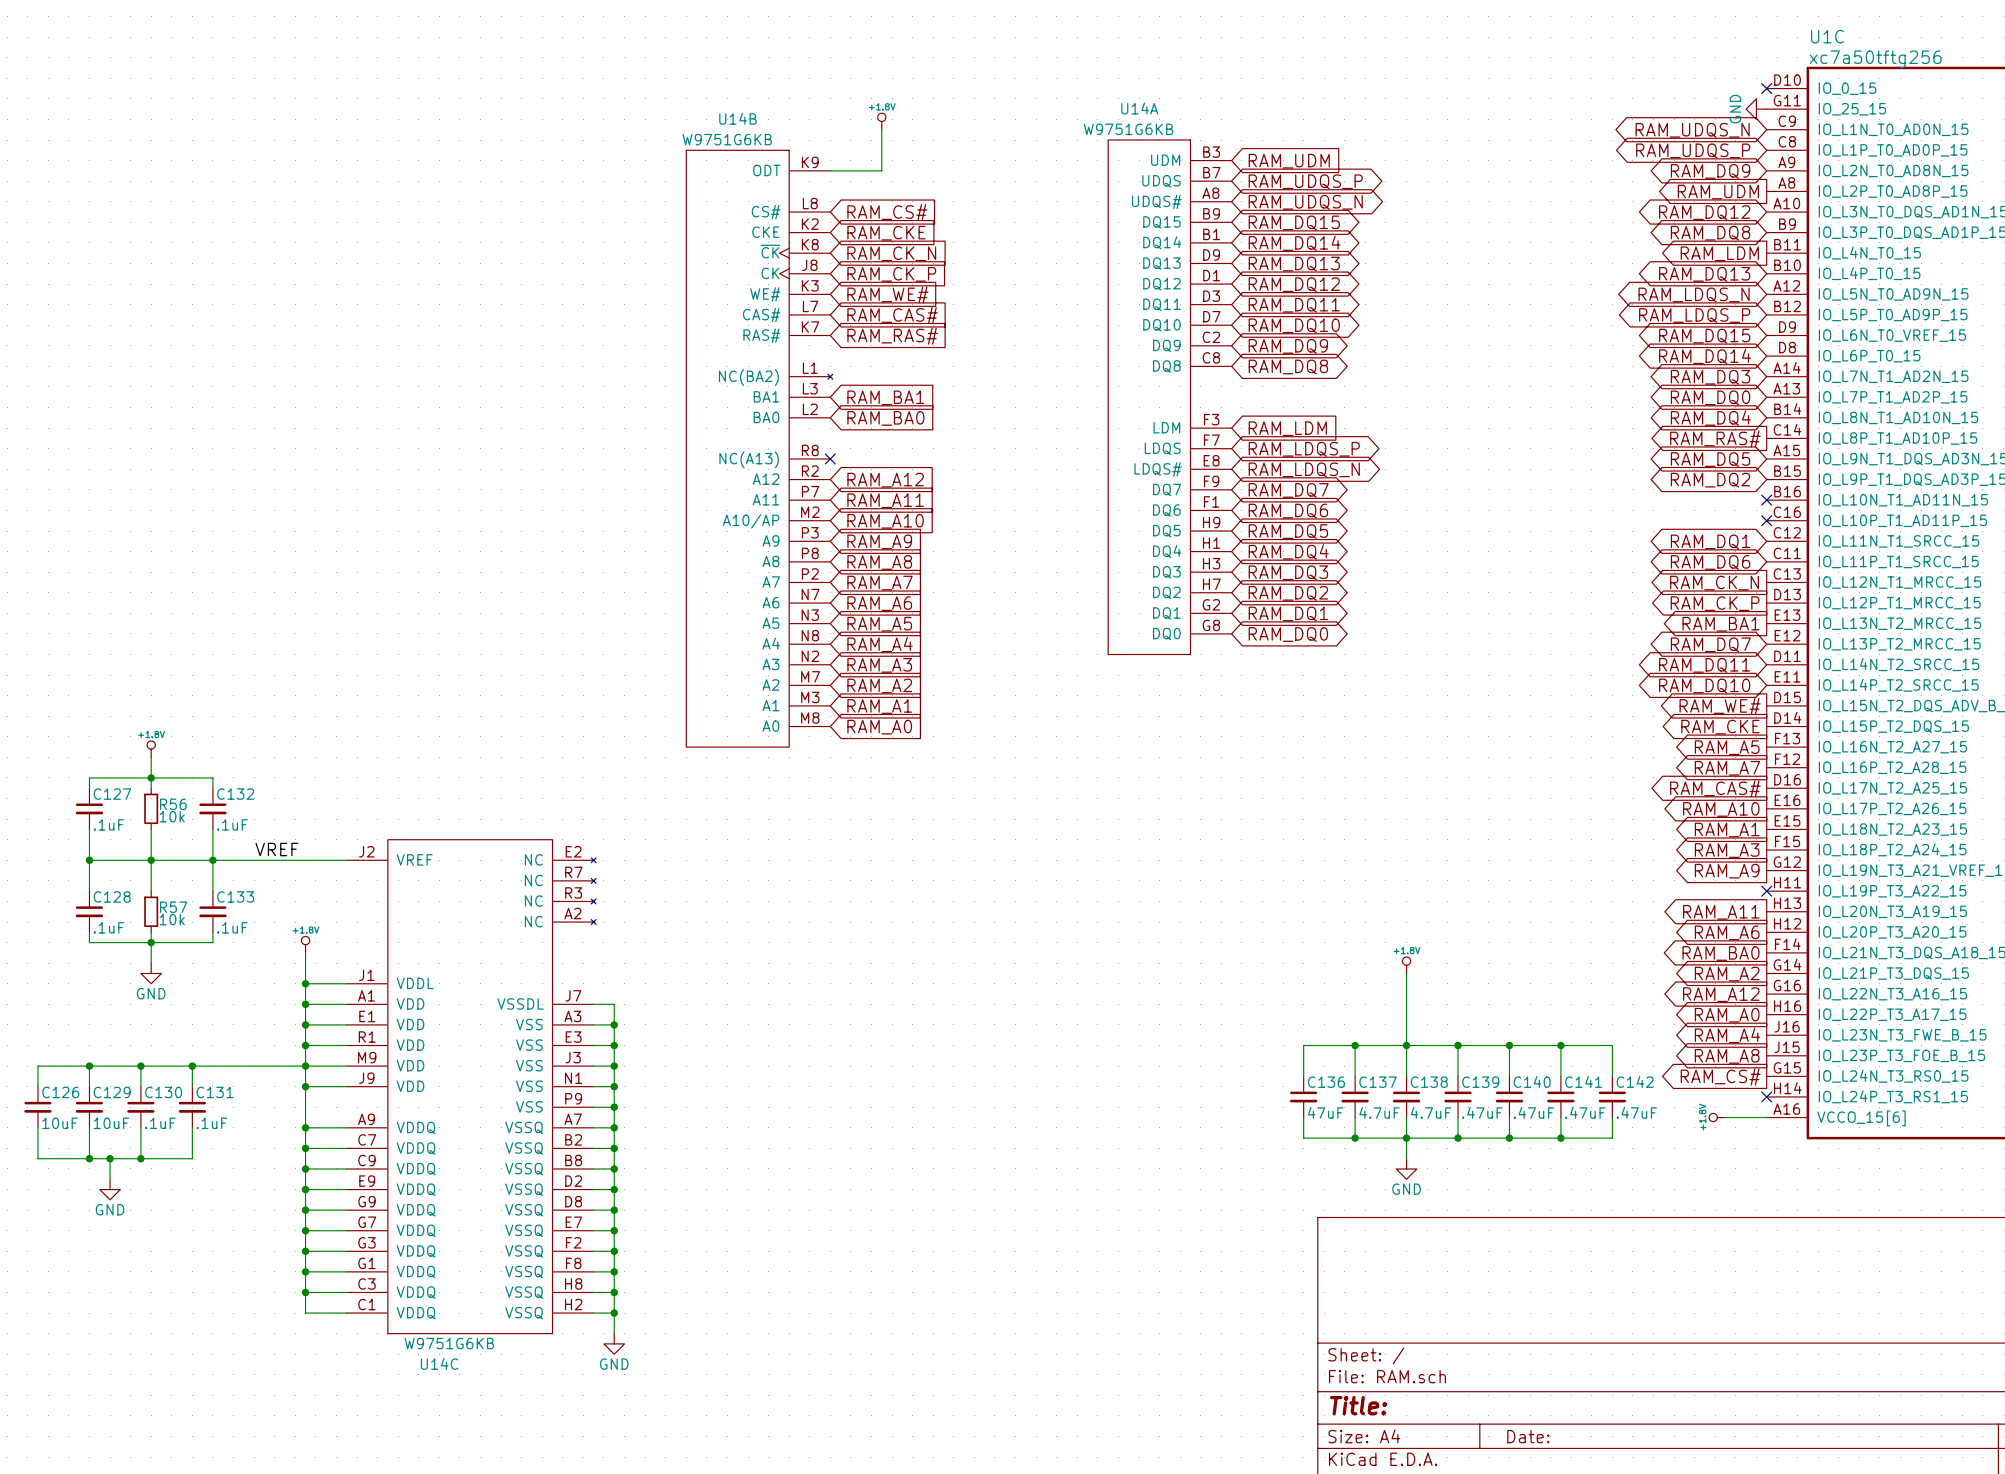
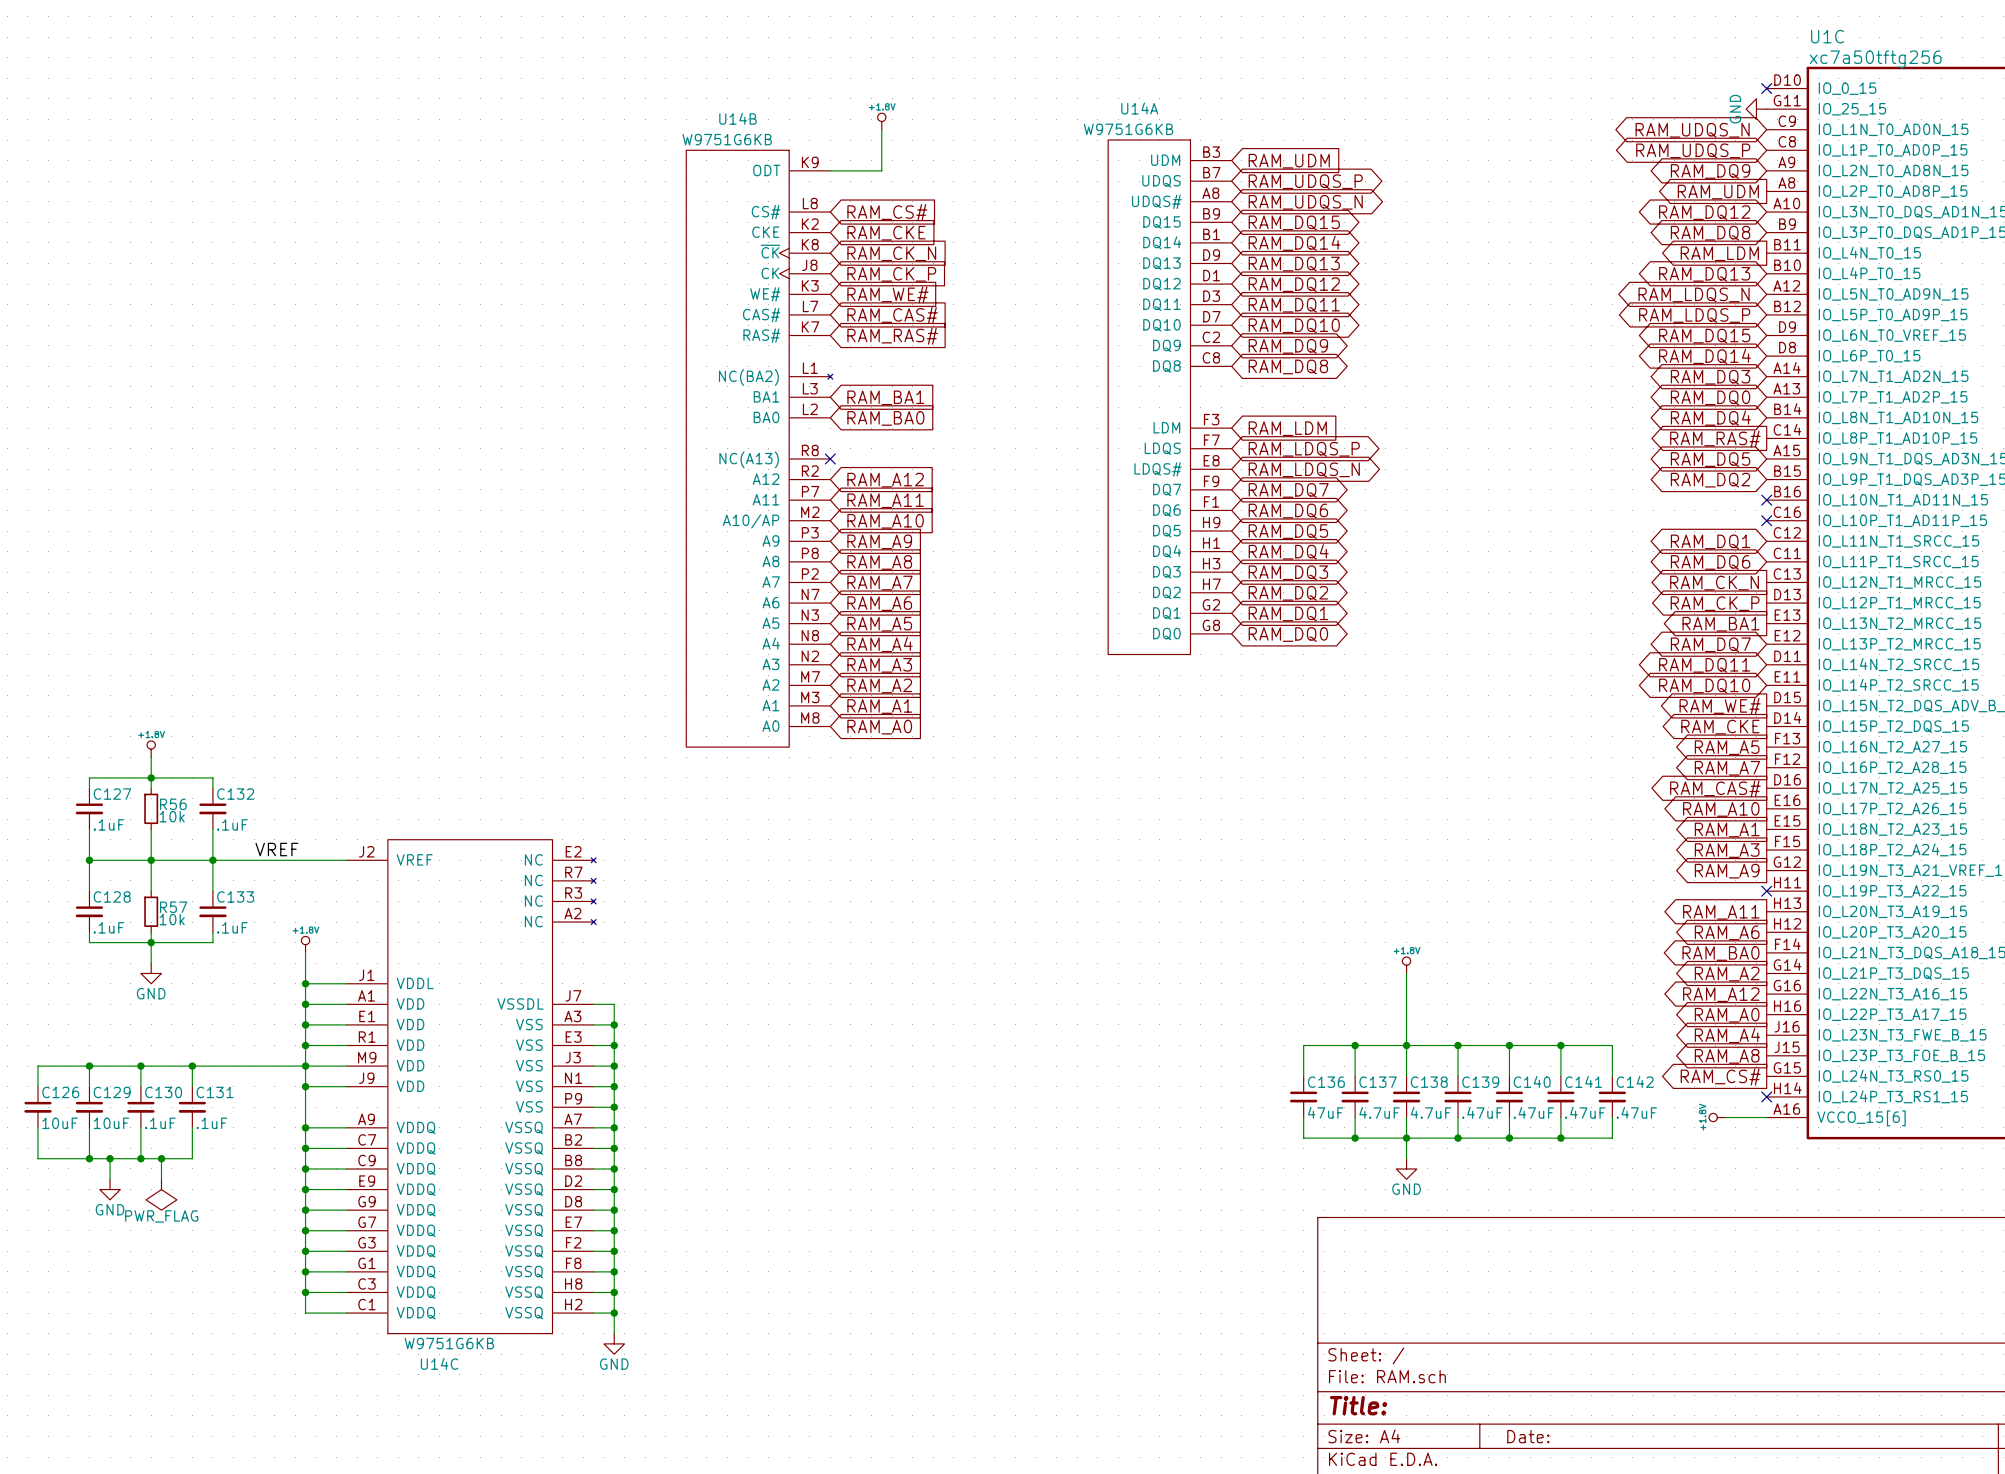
wire: none -> (161, 1158) (161, 1179)
junction: none -> (161, 1158)
power symbol: none -> PWR_FLAG (161, 1194)

